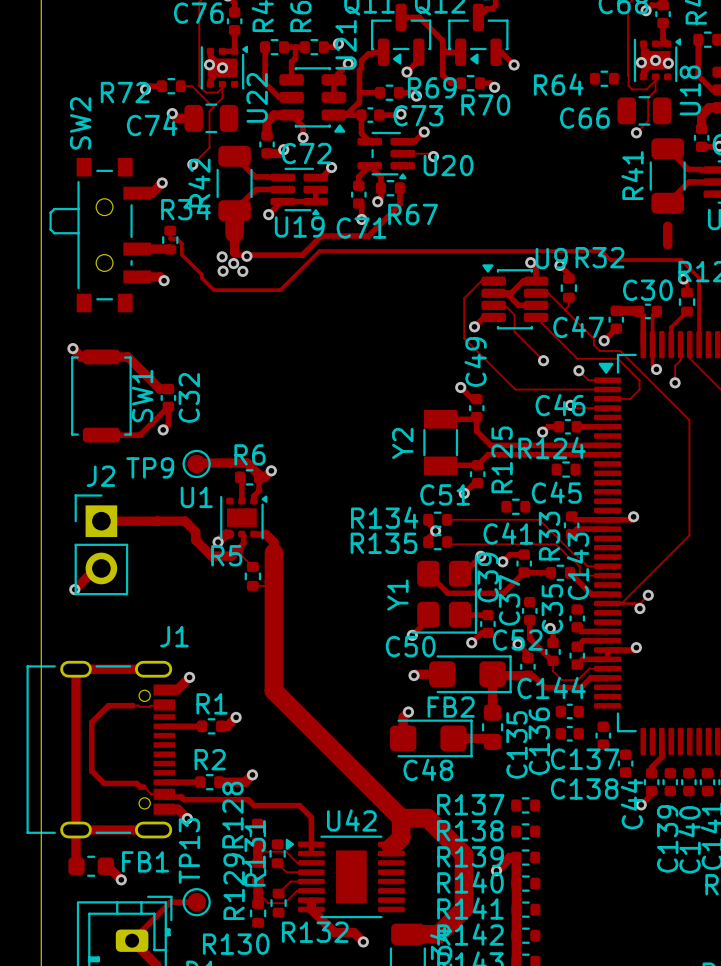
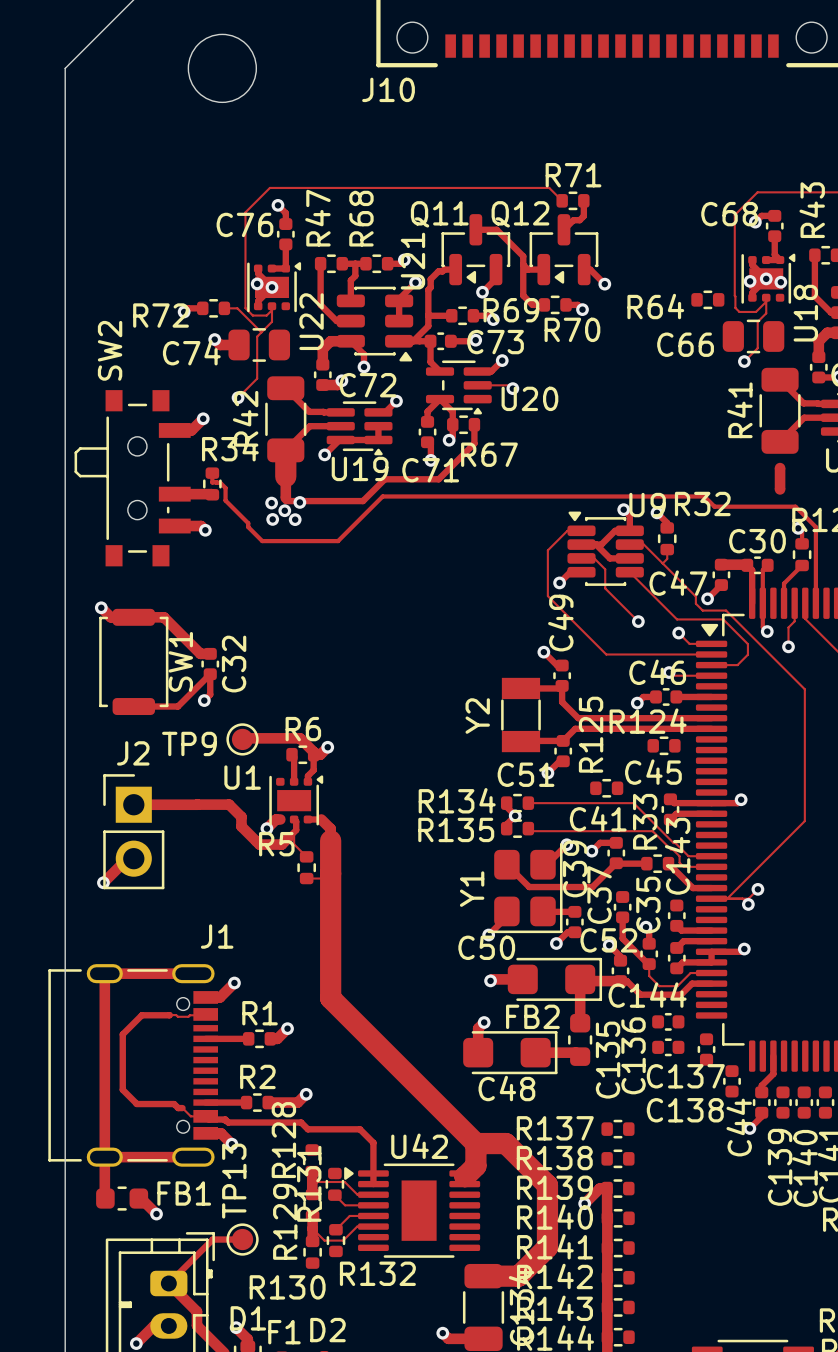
track: (311, 902) (311, 909) (334, 932) (353, 932) (363, 941) -> none
via: (363, 941) -> none

